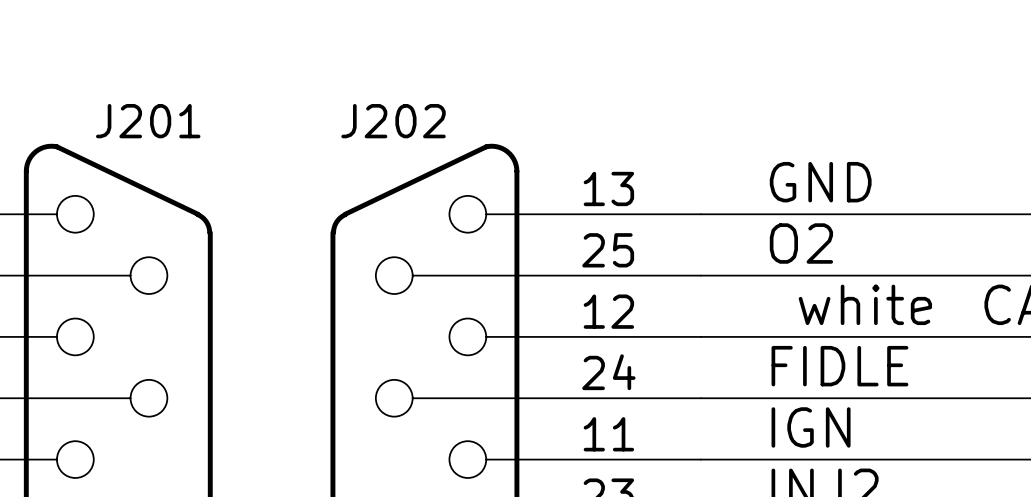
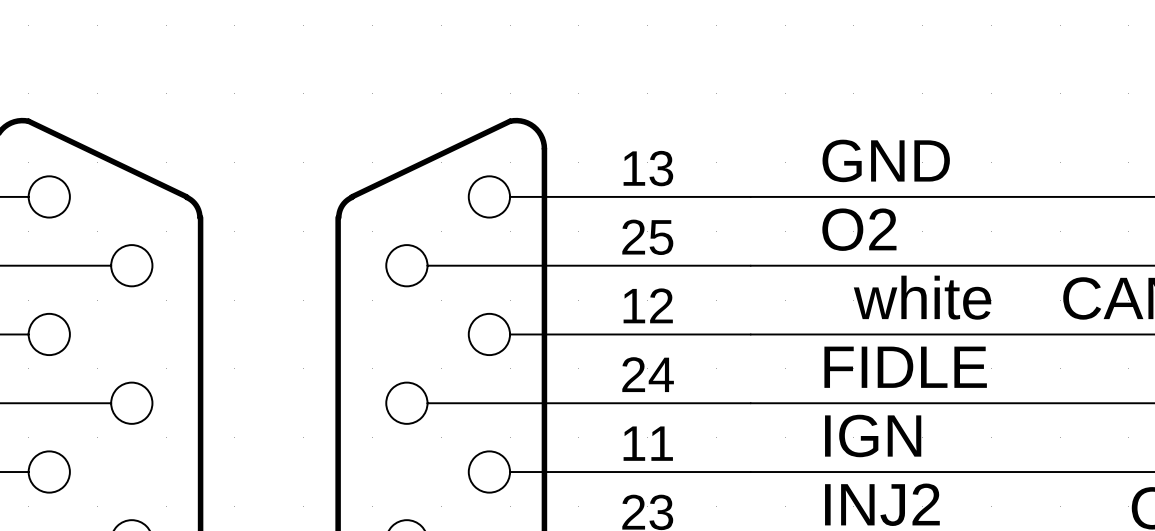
J201 name: J201 (148, 121) -> none
J202 name: J202 (393, 121) -> none

